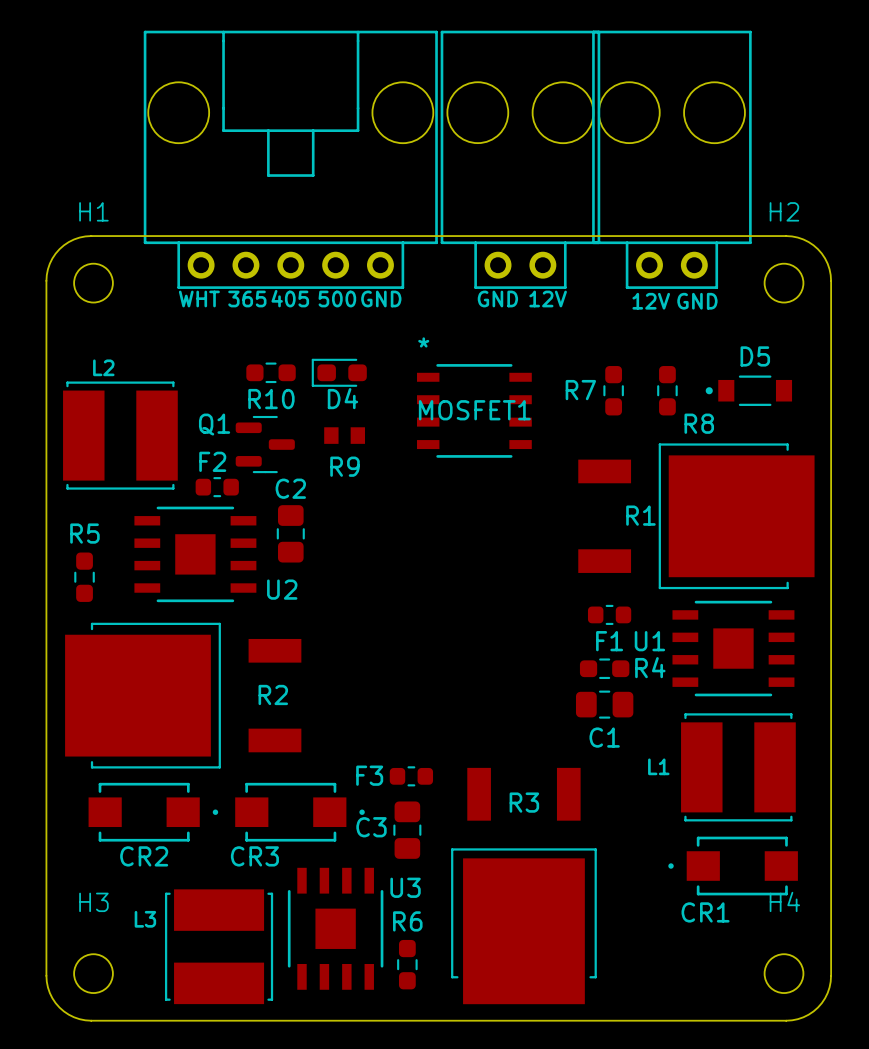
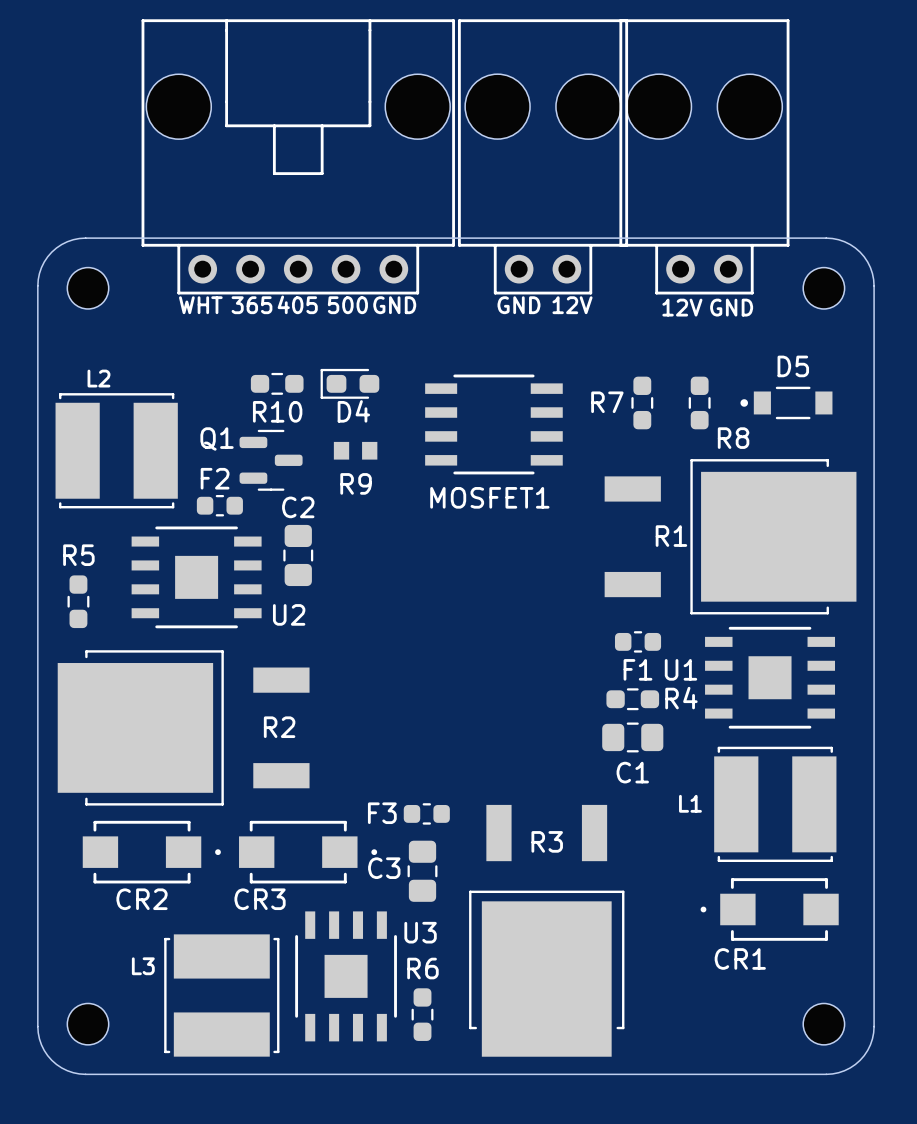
H1 name: H1 (93, 211) -> none
H2 name: H2 (784, 211) -> none
MOSFET1 footprint: [417, 364, 532, 458] -> [425, 374, 563, 475]
MOSFET1 name position: MOSFET1 (474, 410) -> MOSFET1 (489, 497)
H4 name: H4 (784, 901) -> none
H3 name: H3 (93, 902) -> none

